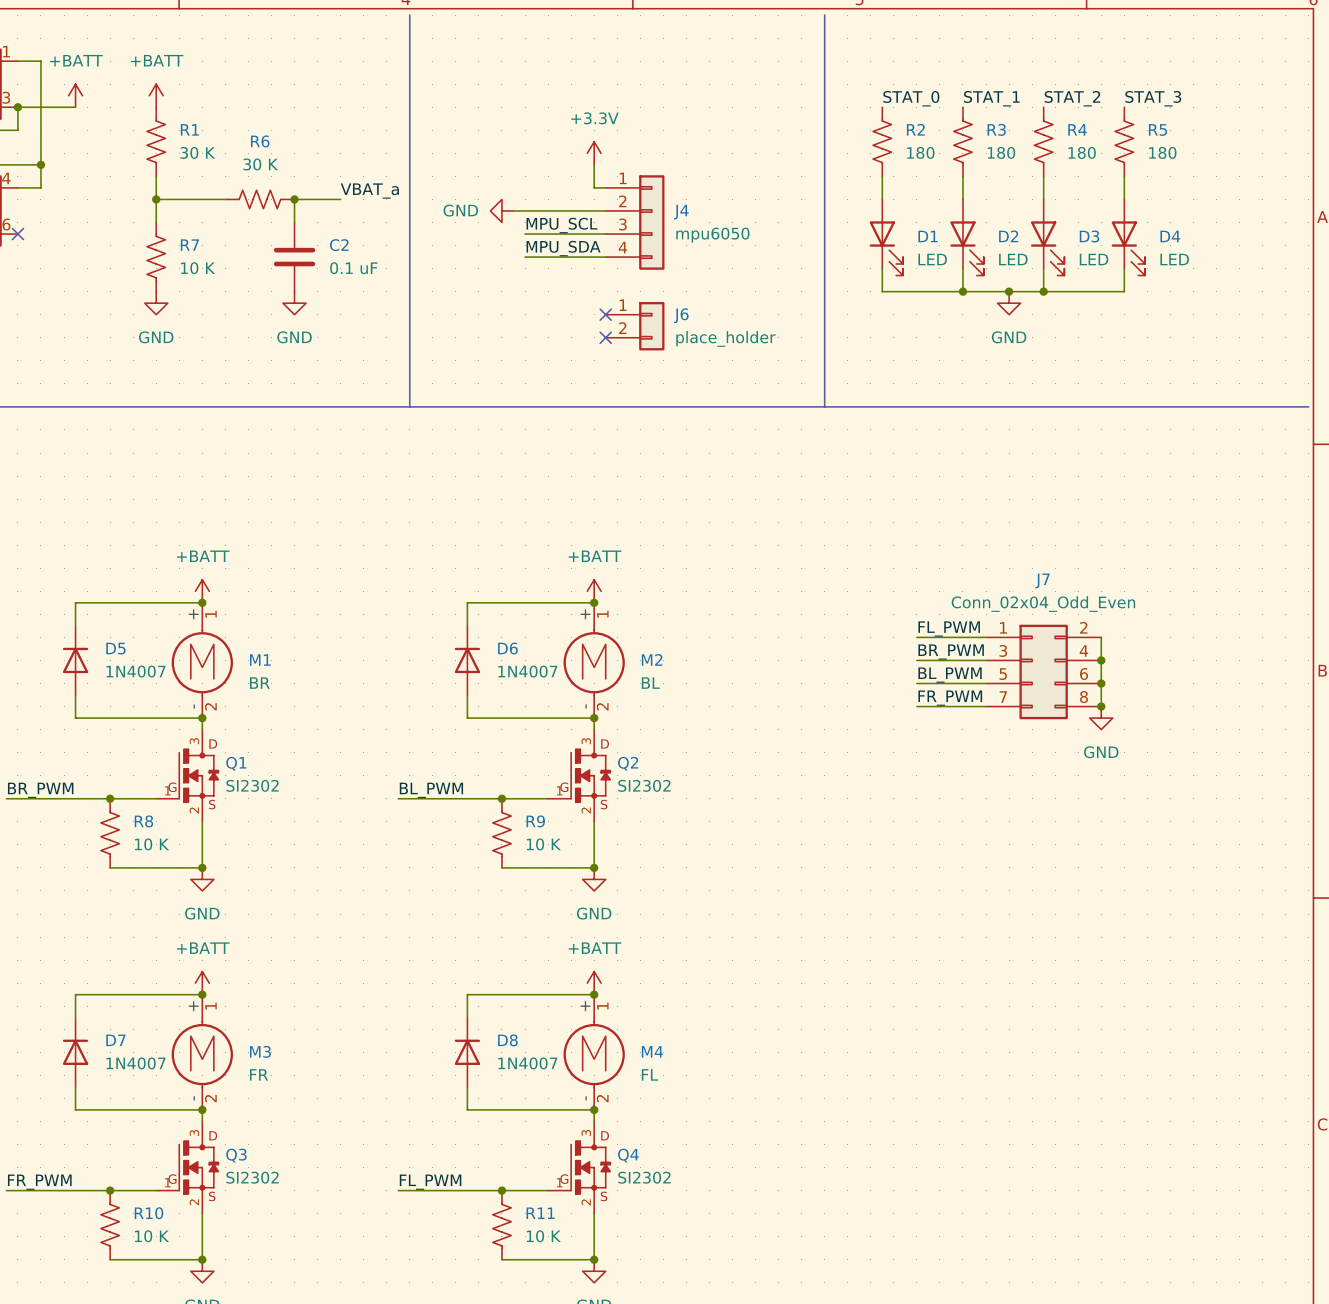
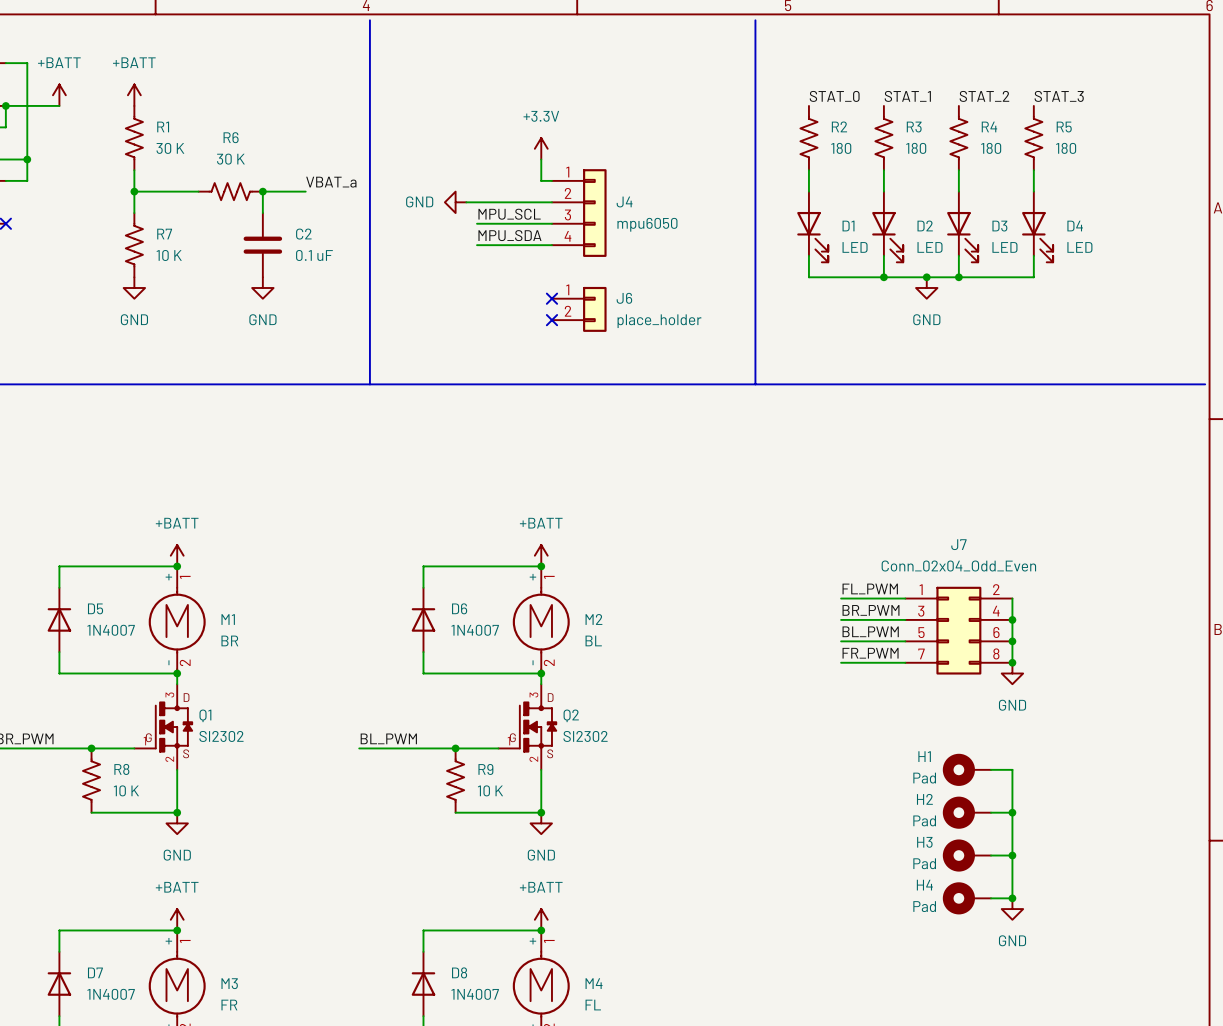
H1: none -> Pad (966, 769)
wire: none -> (991, 769) (1012, 769) (1012, 898) (991, 898)
H2: none -> Pad (966, 812)
wire: none -> (991, 812) (1012, 812)
junction: none -> (1012, 812)
H3: none -> Pad (966, 855)
wire: none -> (991, 855) (1012, 855)
junction: none -> (1012, 855)
H4: none -> Pad (966, 898)
junction: none -> (1012, 898)
power symbol: none -> GND (1012, 909)

